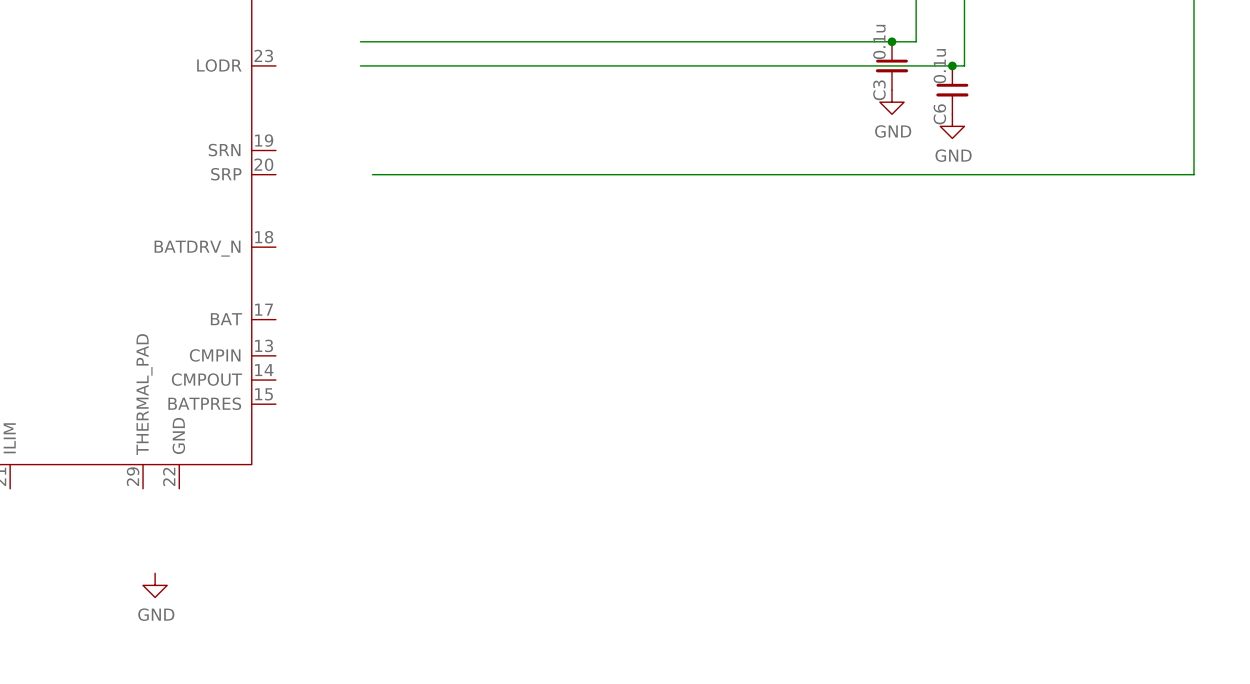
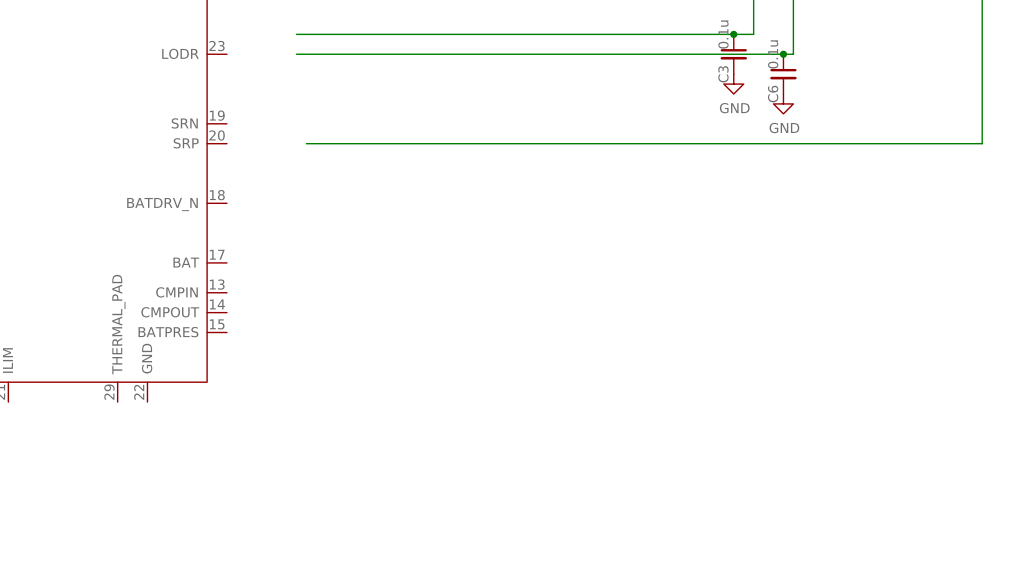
power symbol: GND (155, 585) -> none

